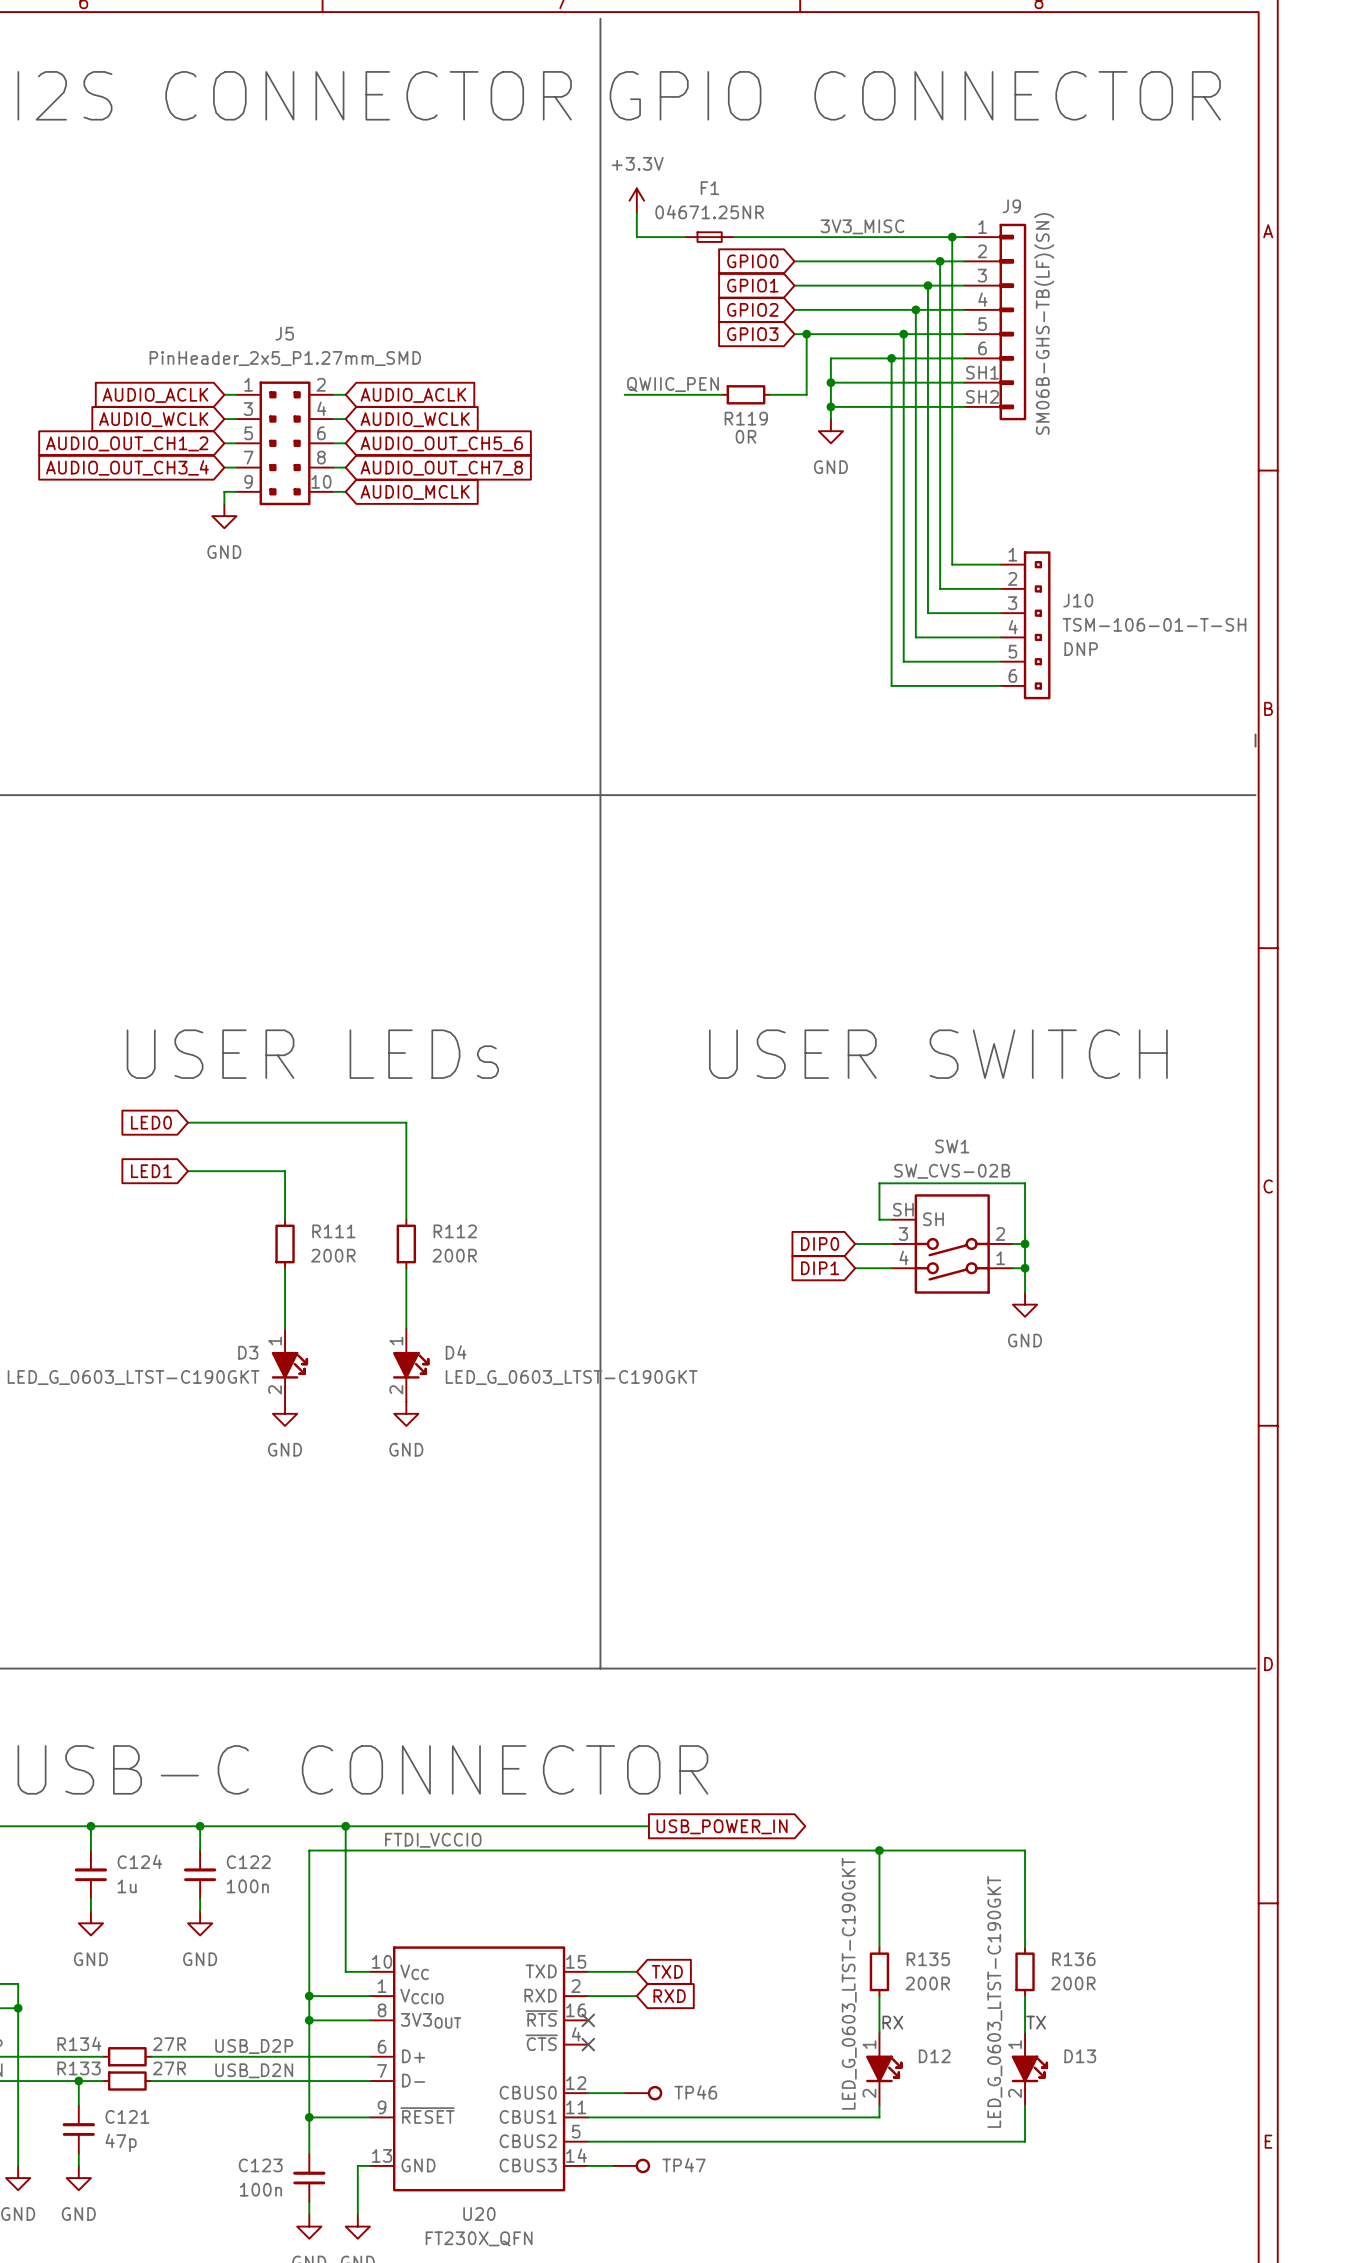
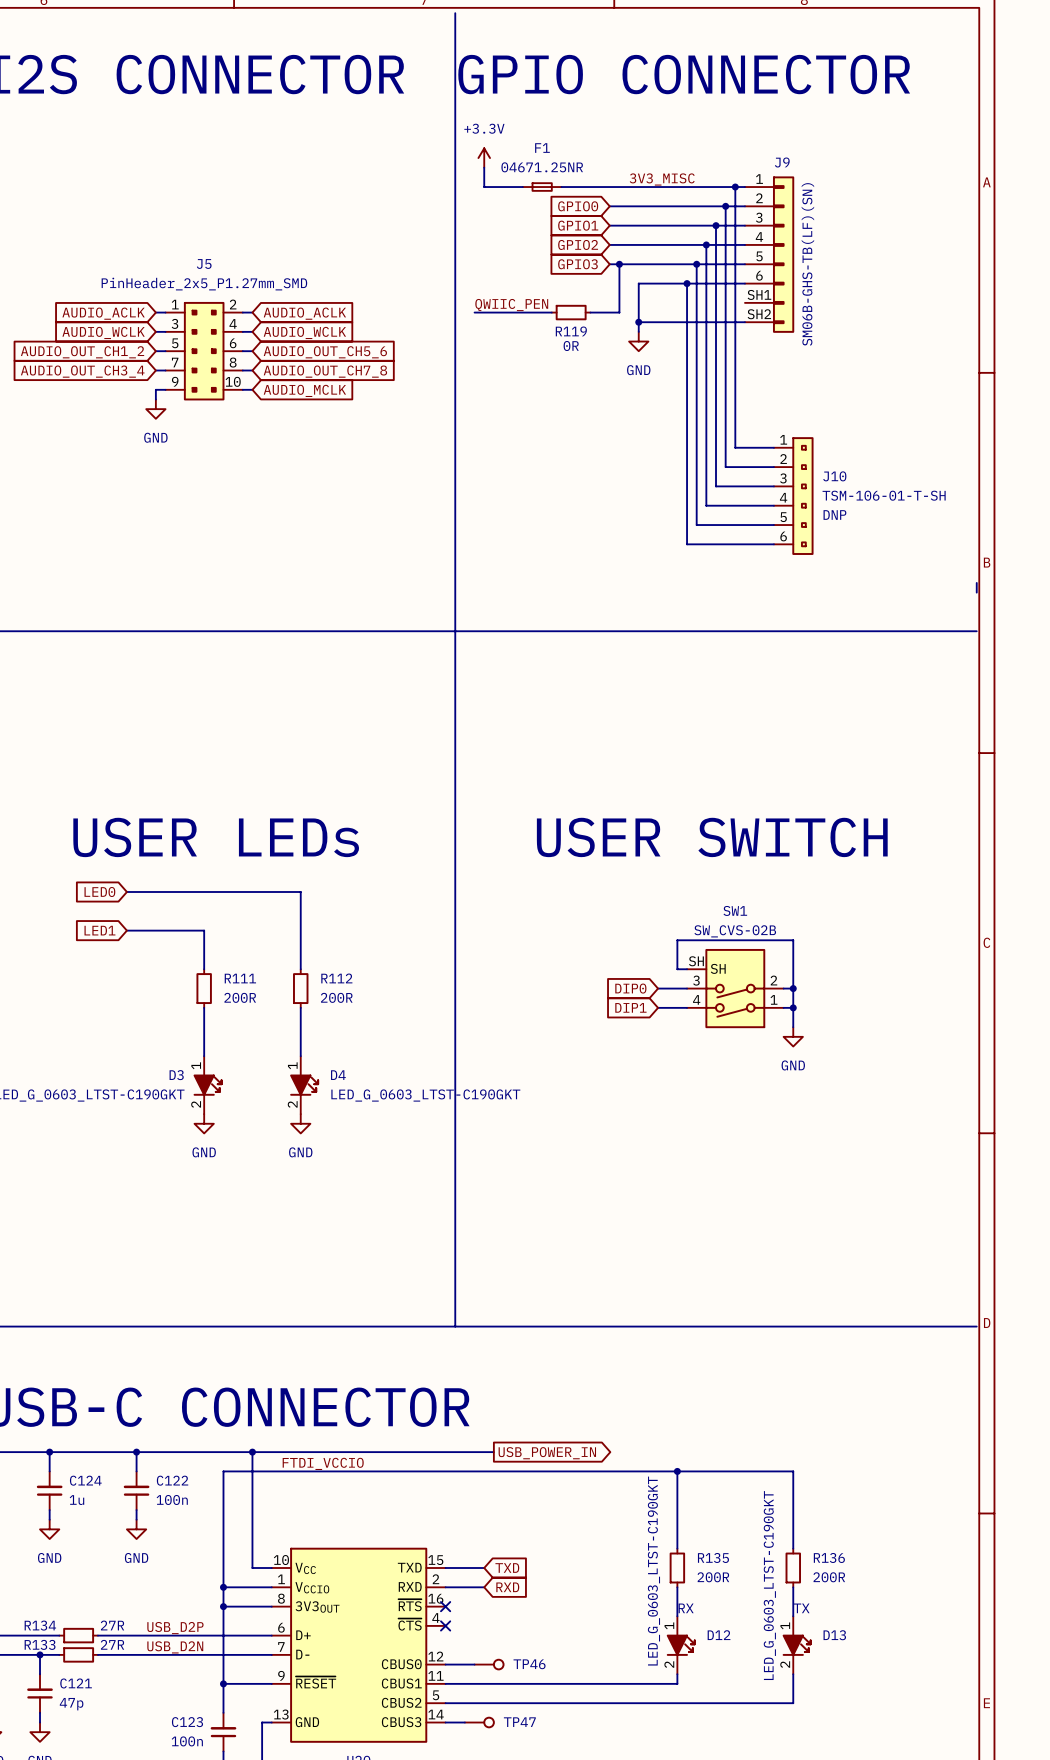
wire: (830, 382) (964, 382) -> none
junction: (830, 382) -> none

